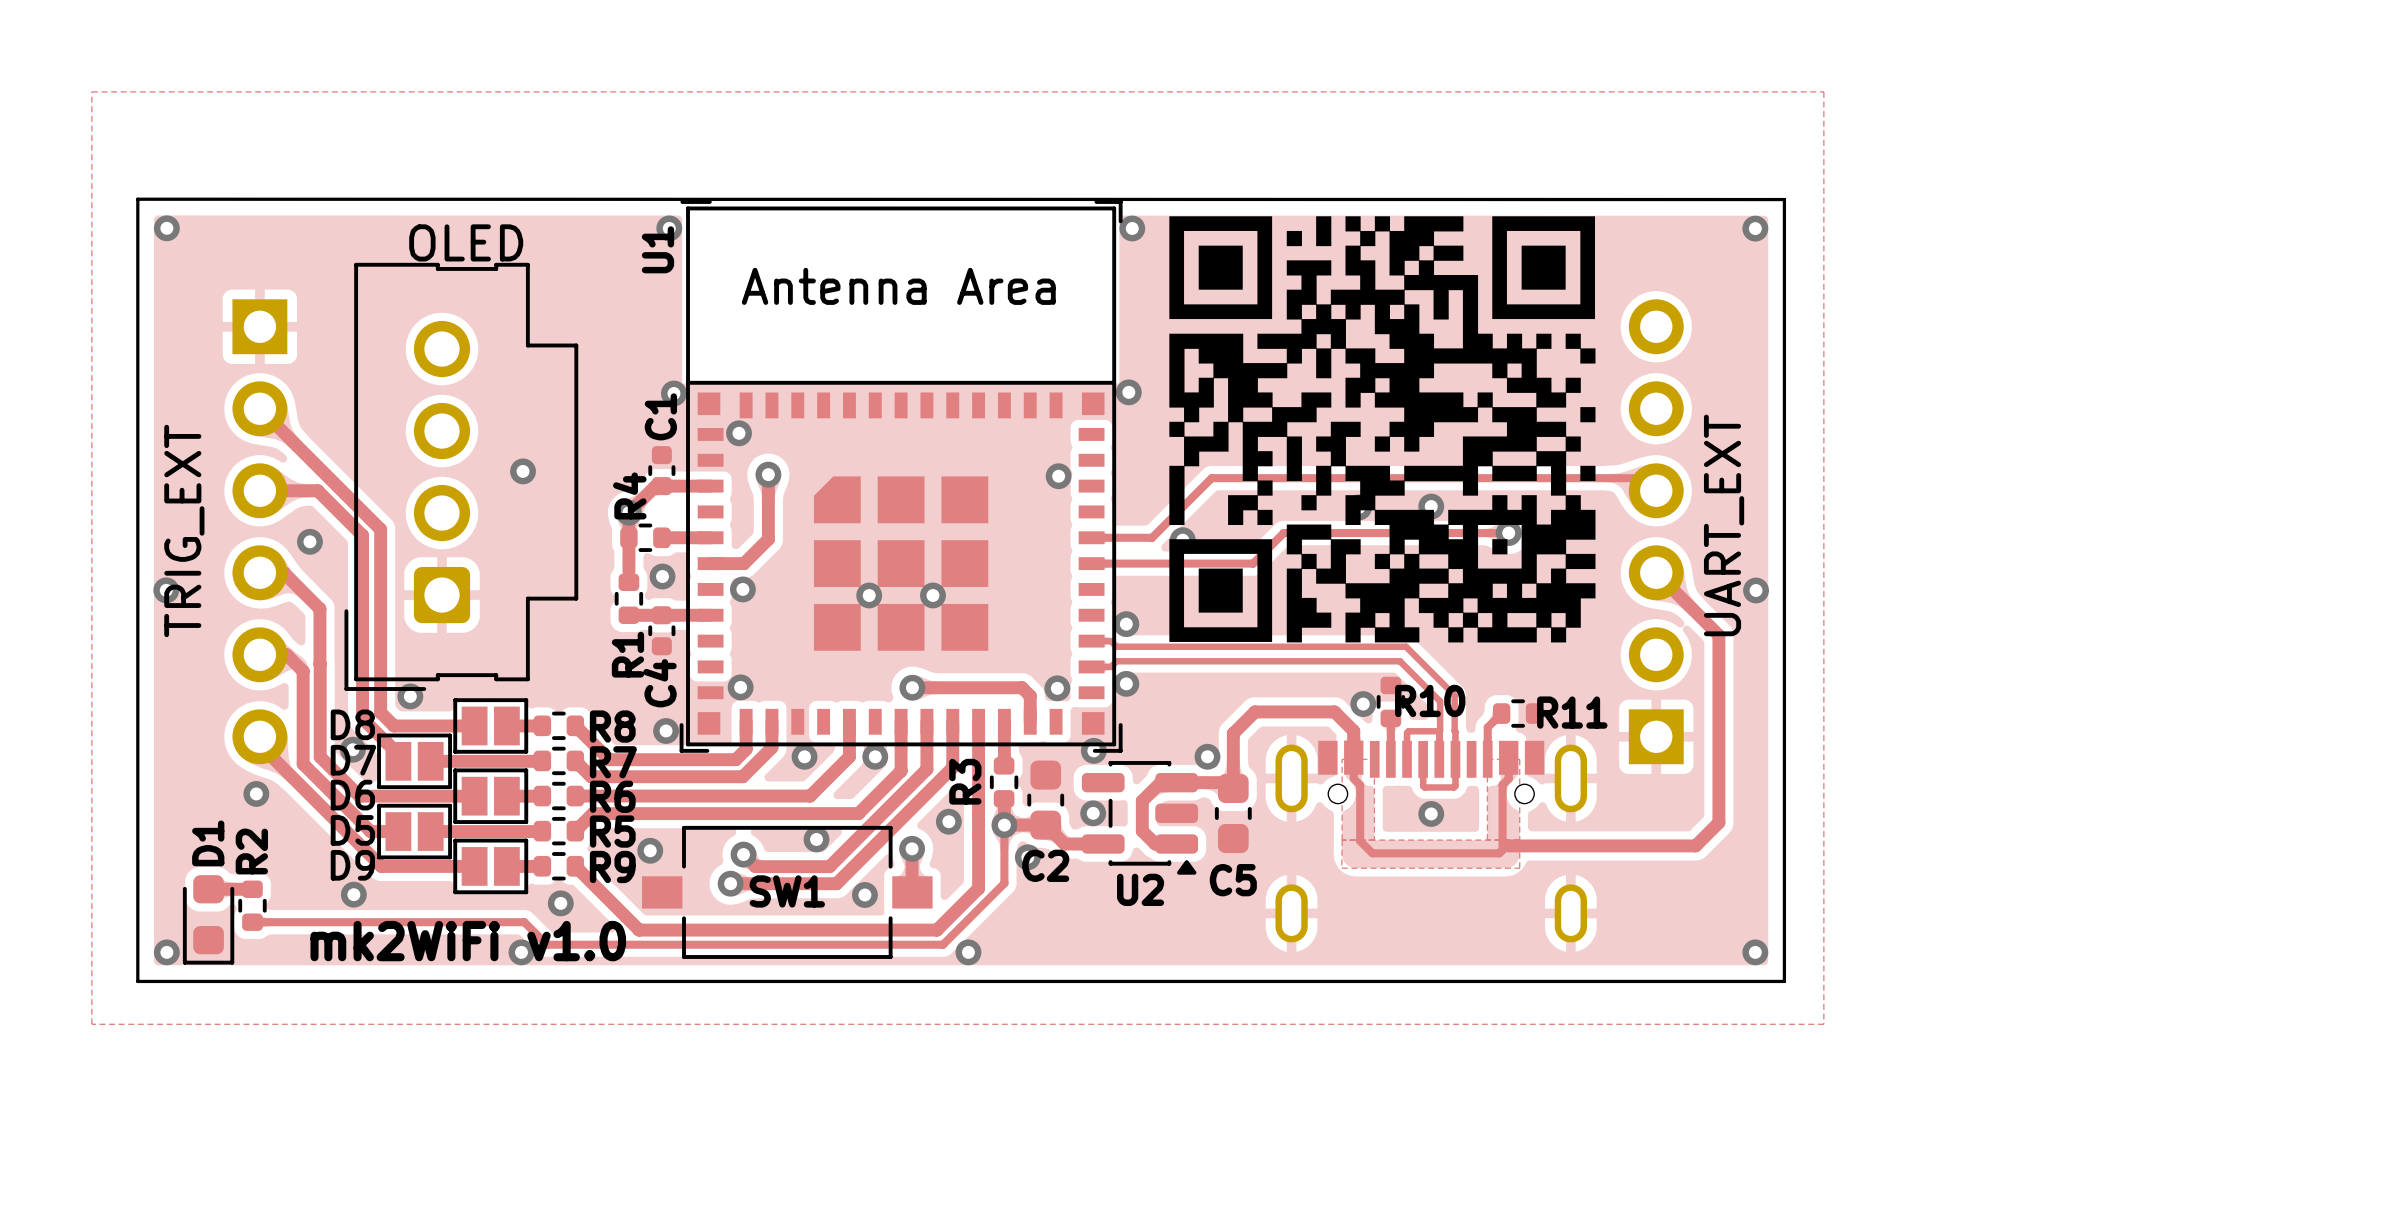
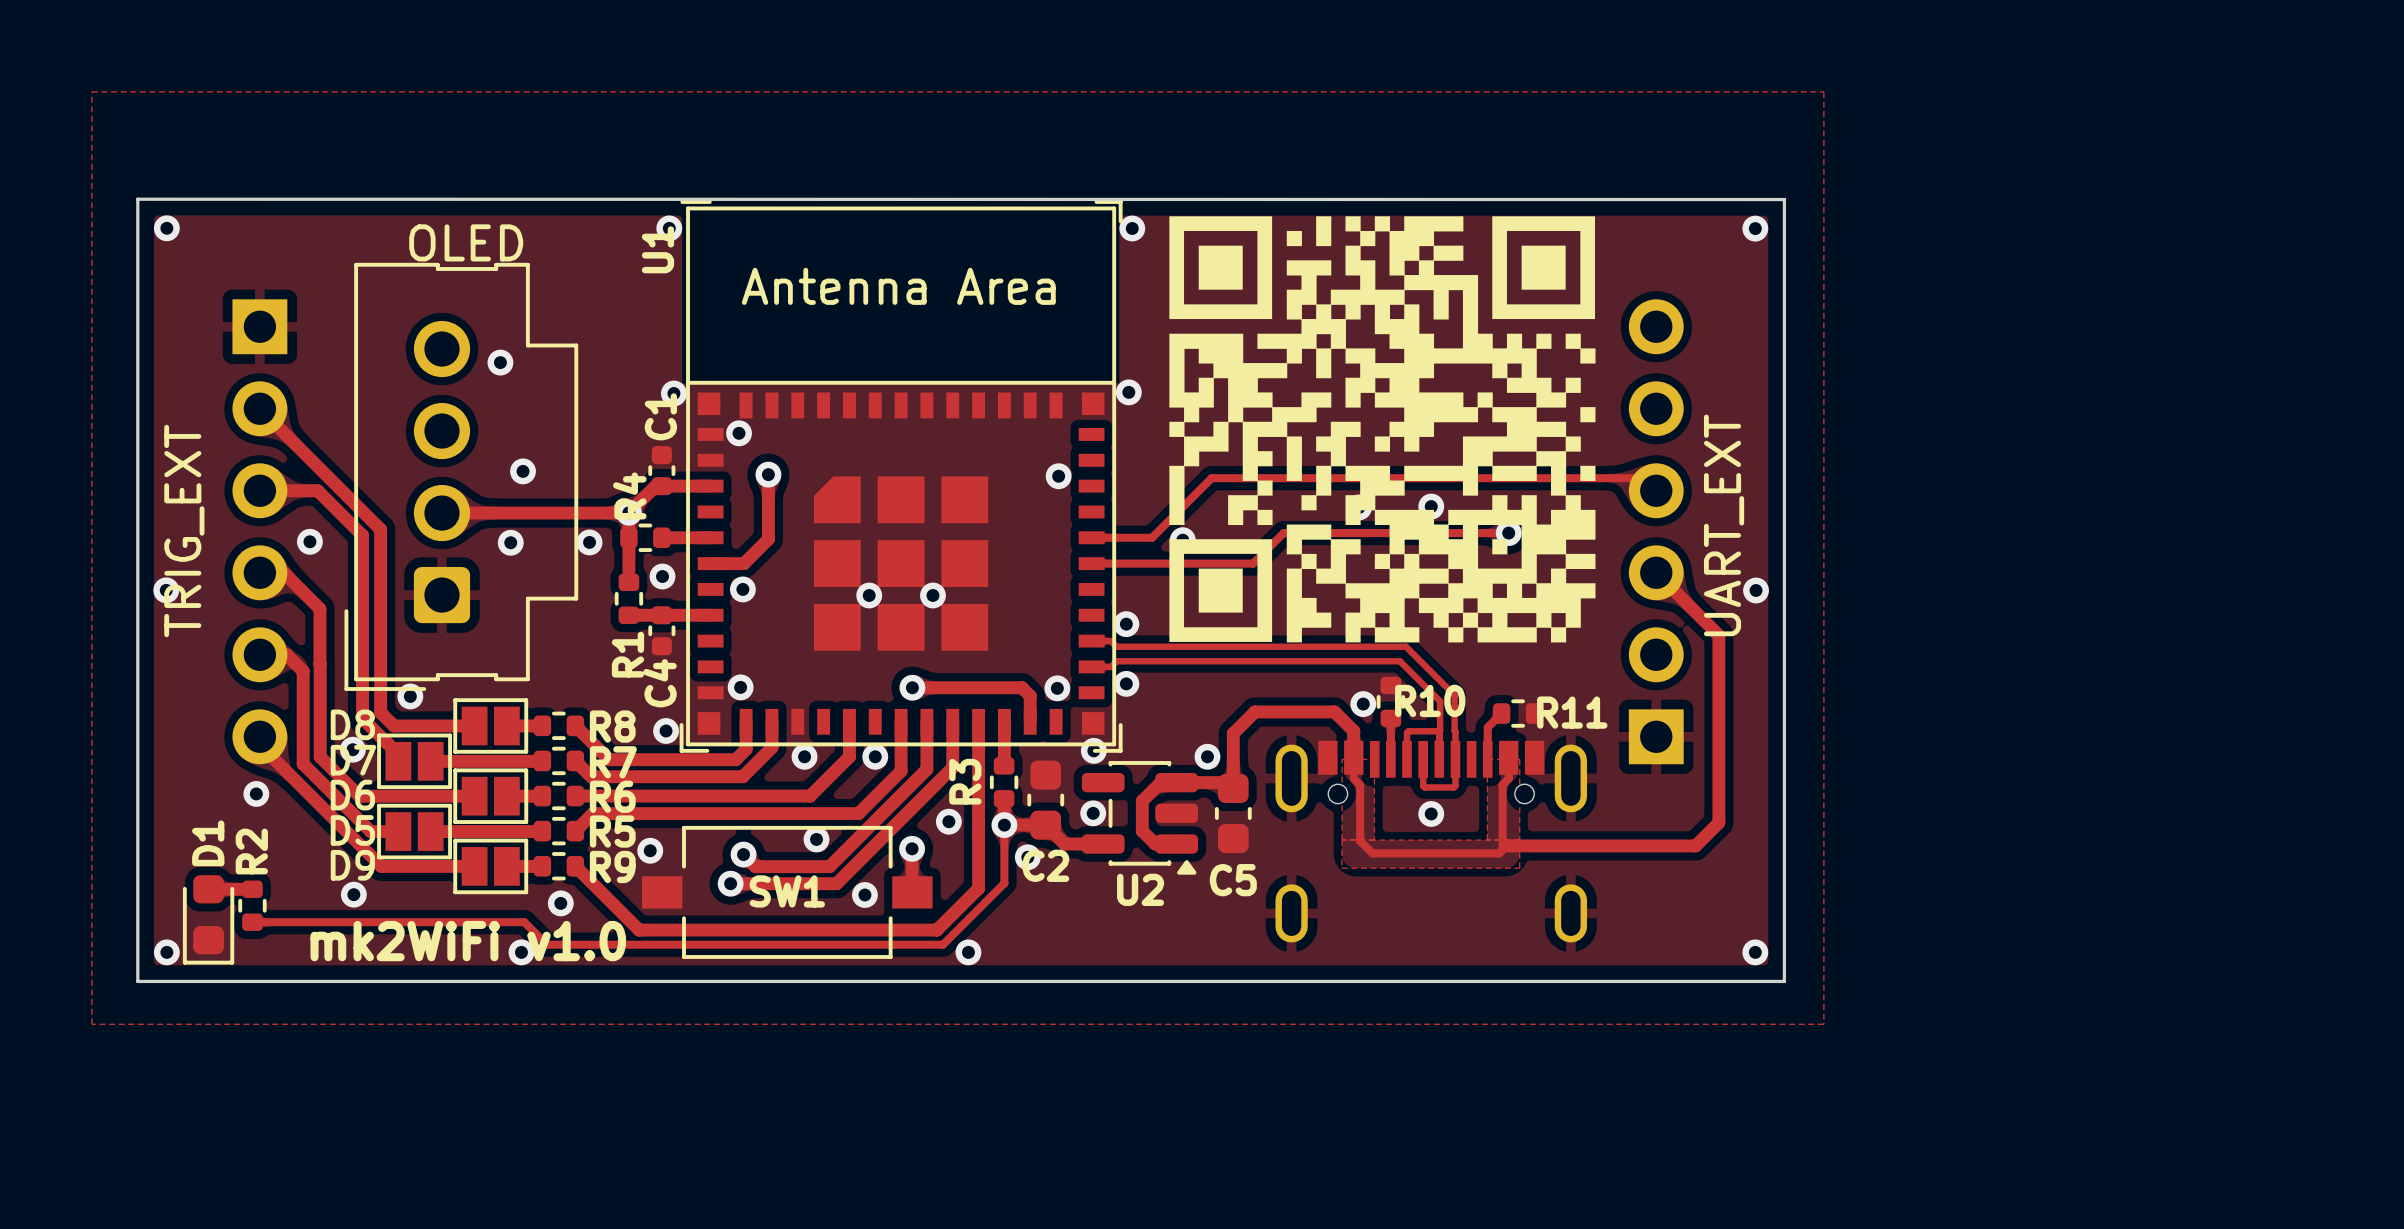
via: none -> (500, 362)
track: none -> (441, 513) (628, 513)
via: none -> (510, 542)
via: none -> (589, 542)

